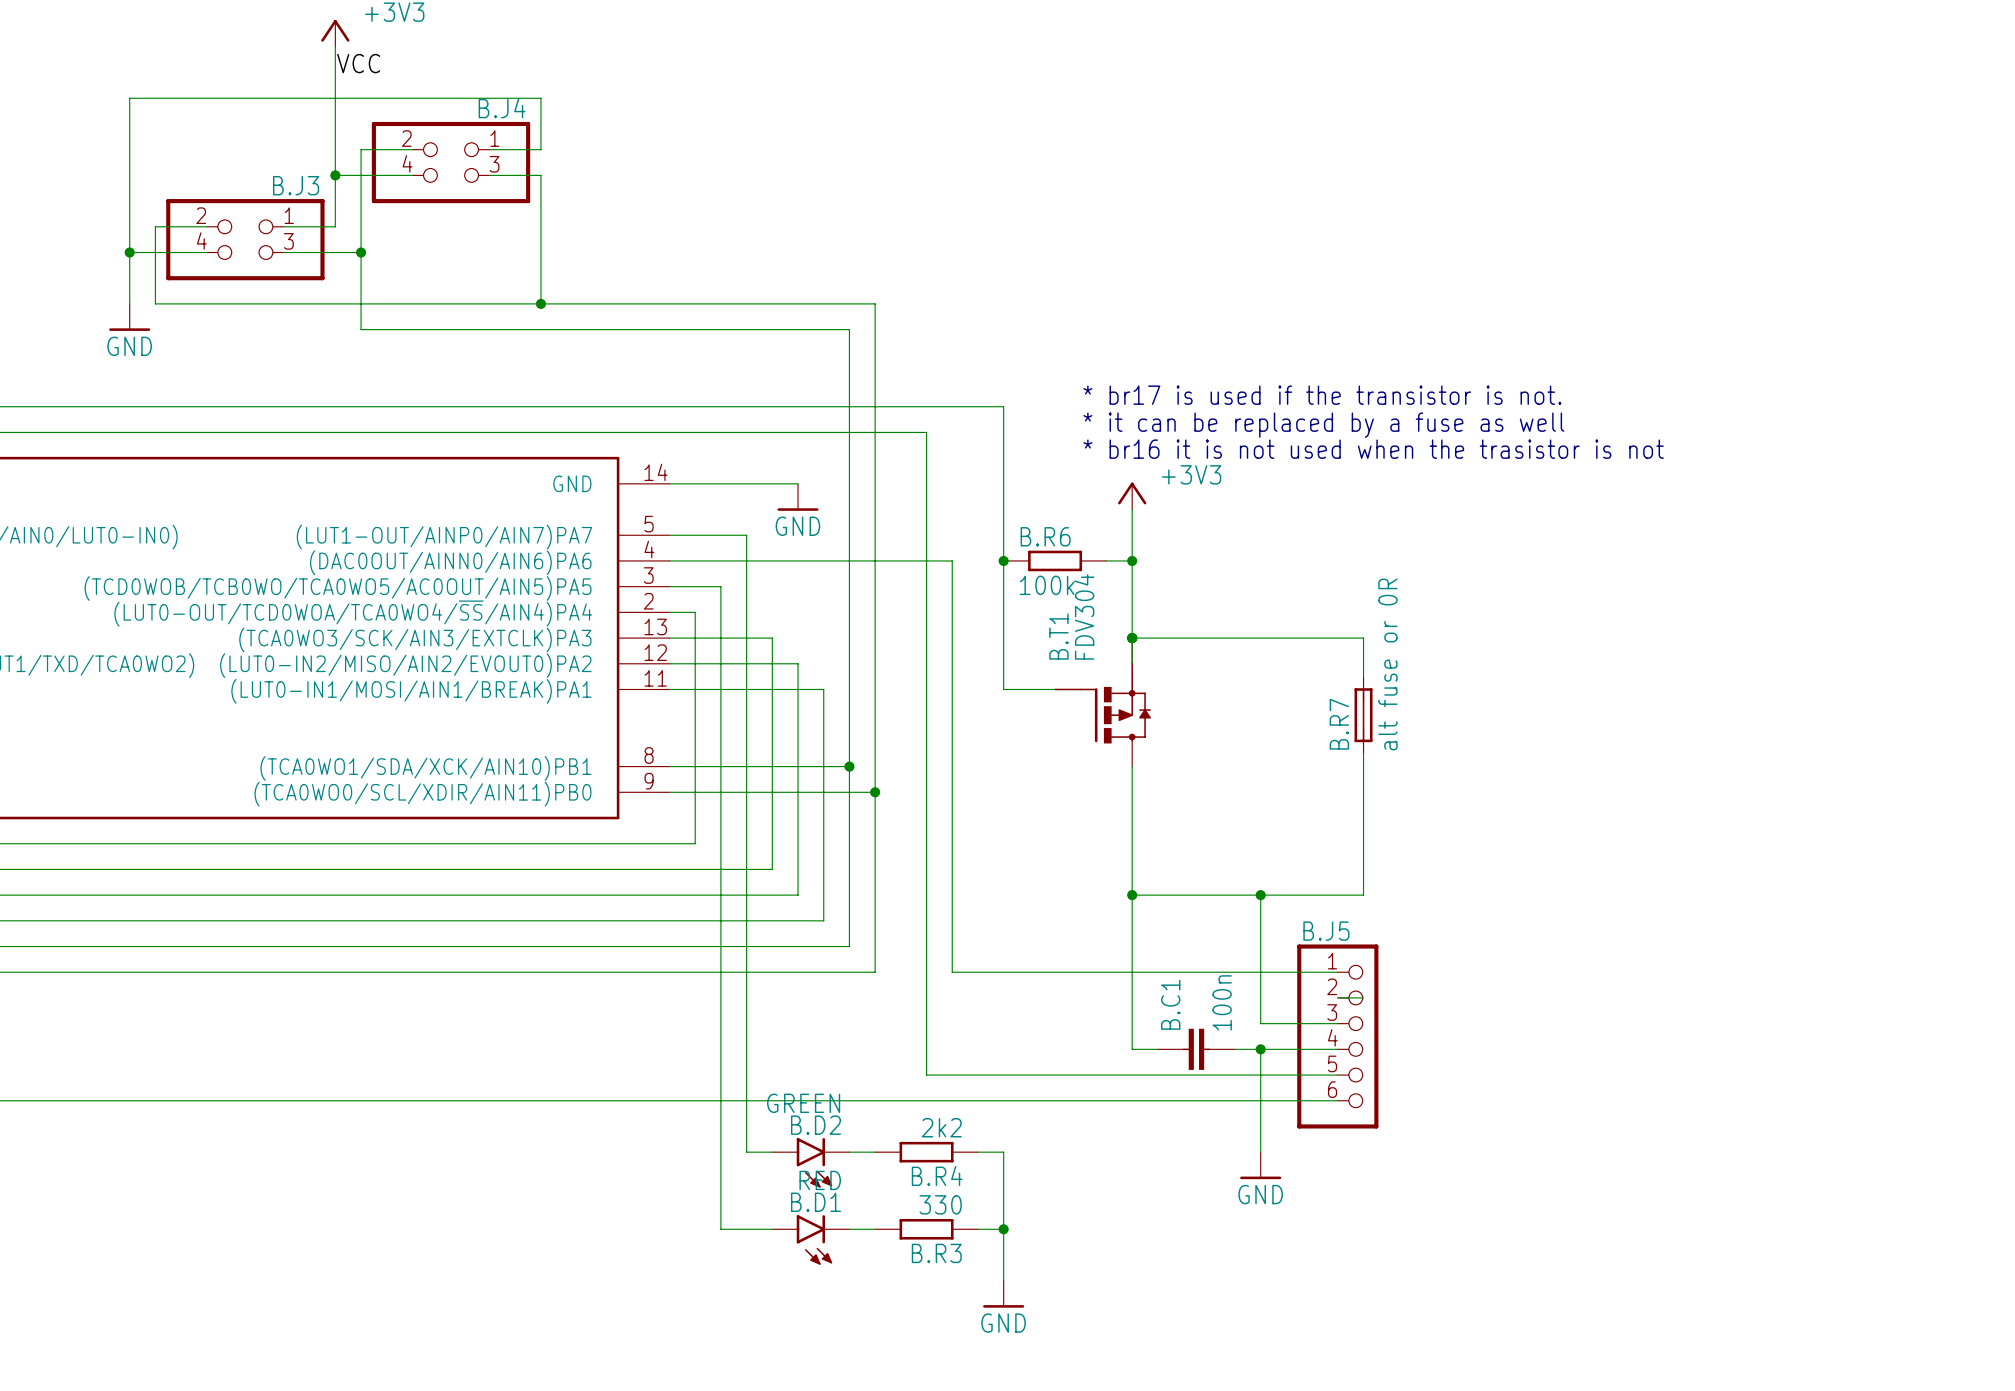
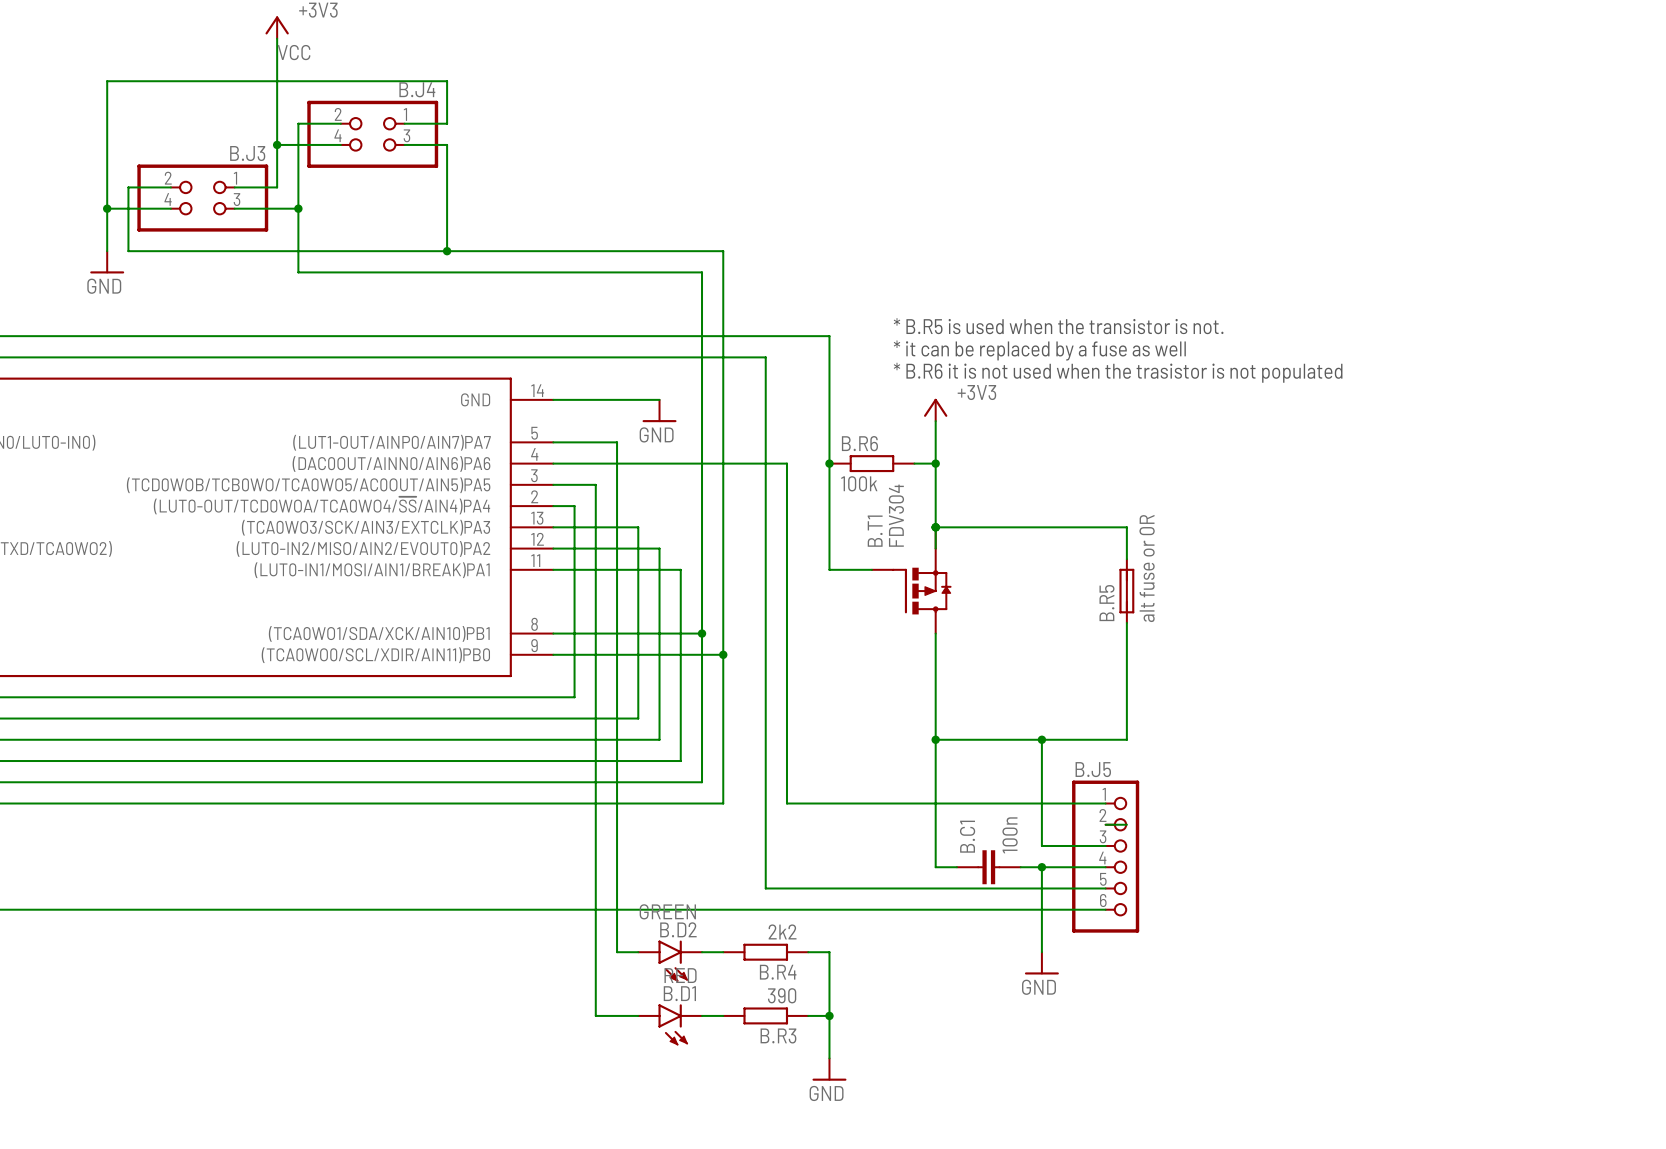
text: * br17 is used if the transistor is not. (1322, 395) -> * B.R5 is used when the transistor is not. (1058, 326)
text: * br16 it is not used when the trasistor is not (1373, 449) -> * B.R6 it is not used when the trasistor is not populated (1118, 372)
B.R7 name: B.R7 (1339, 724) -> B.R5 (1106, 603)
B.R3 value: 330 (940, 1204) -> 390 (782, 995)

